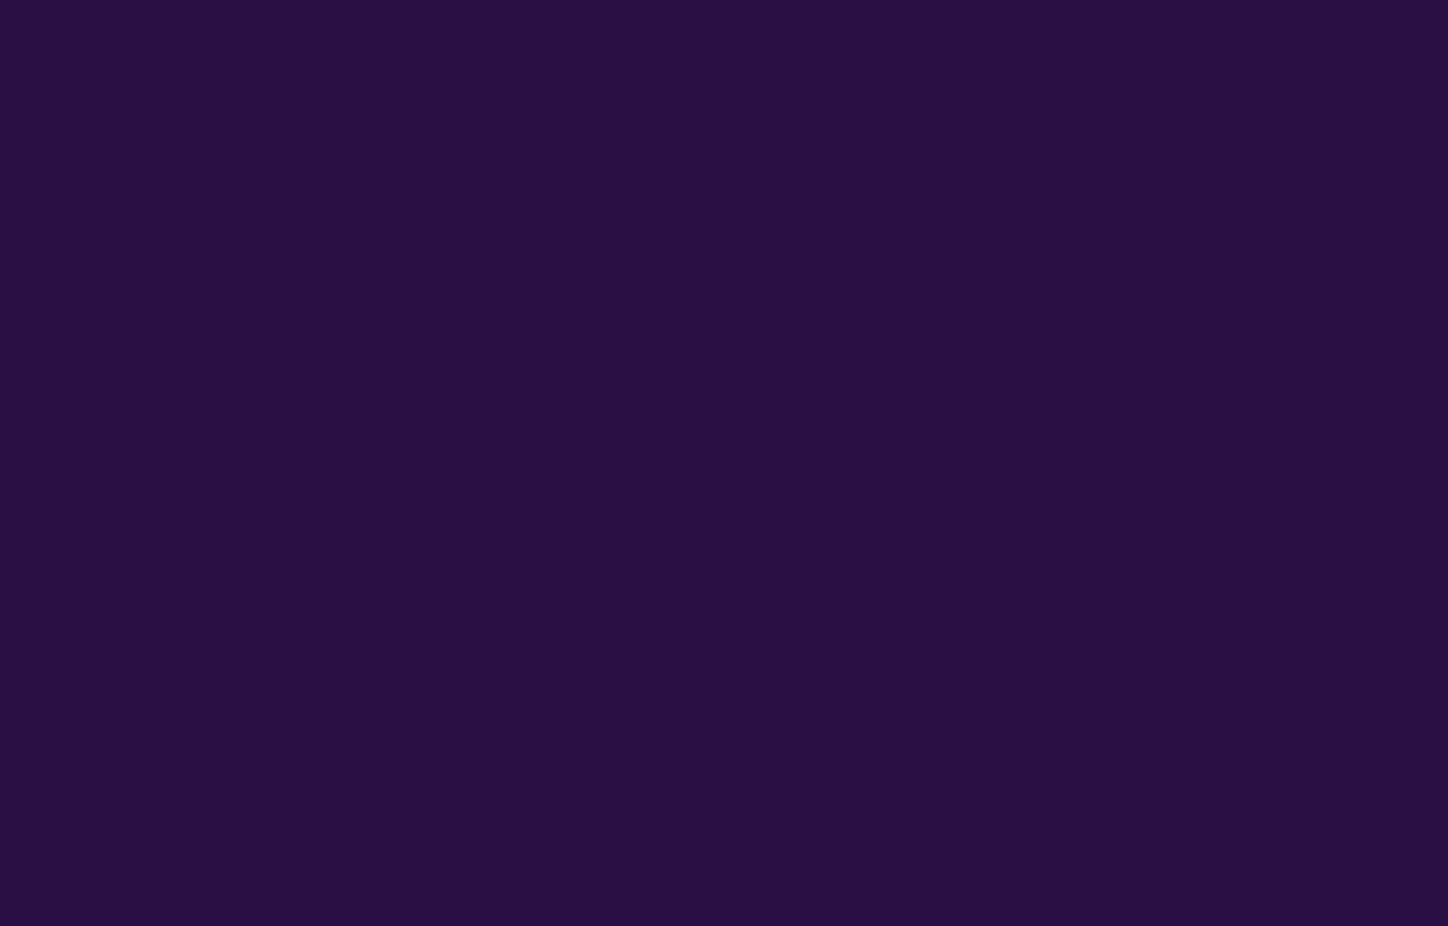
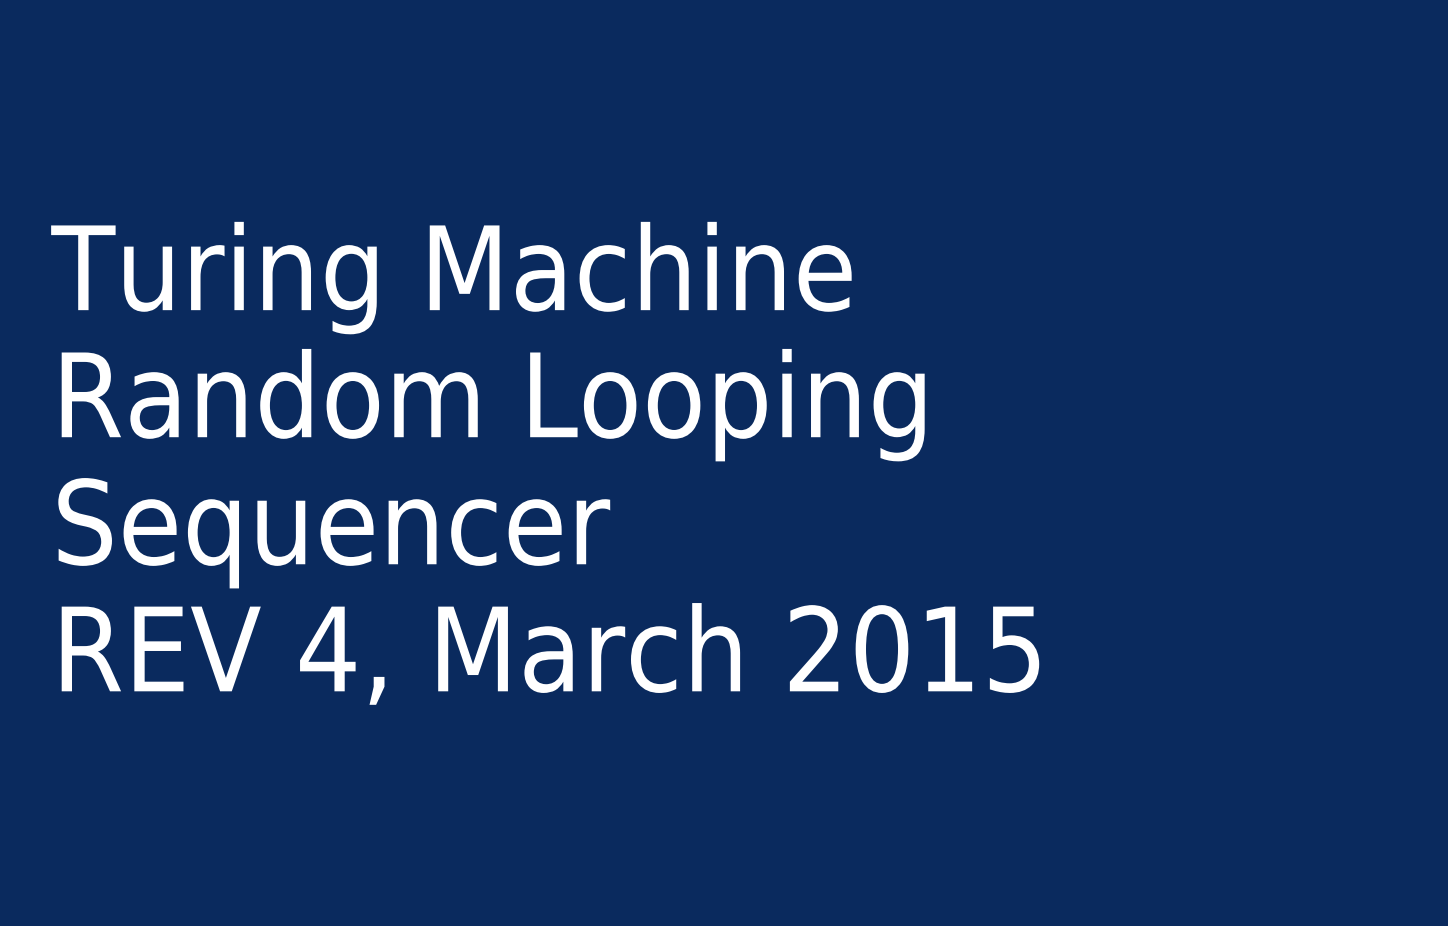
text: none -> Turing Machine (451, 278)
text: none -> Random Looping (493, 405)
text: none -> Sequencer (334, 533)
text: none -> REV 4, March 2015 (550, 653)

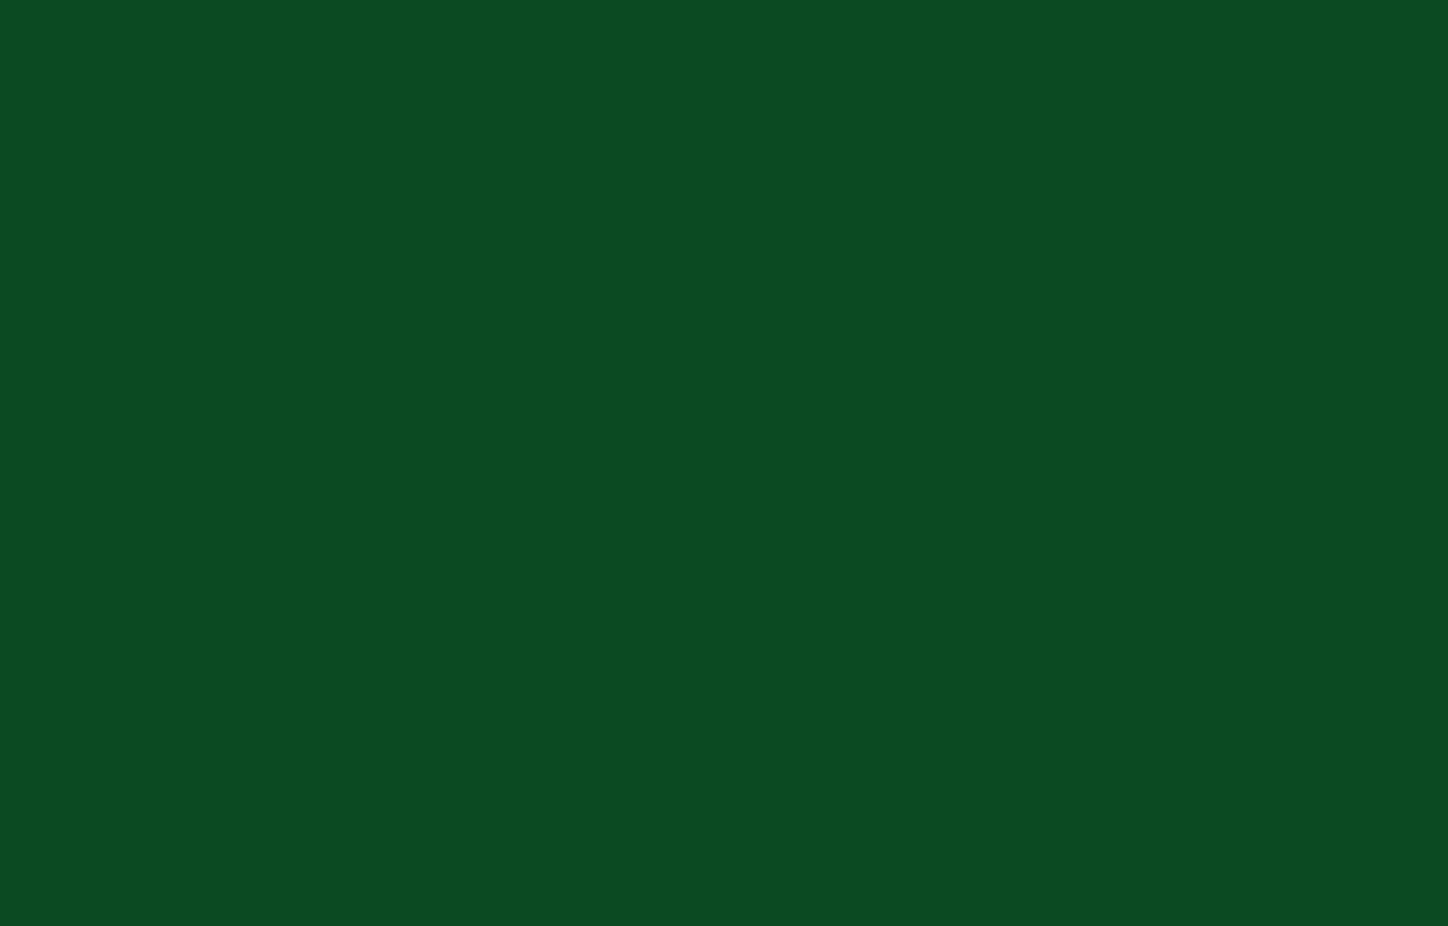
text: Turing Machine (451, 278) -> none
text: Random Looping (493, 405) -> none
text: Sequencer (334, 533) -> none
text: REV 4, March 2015 (550, 653) -> none

